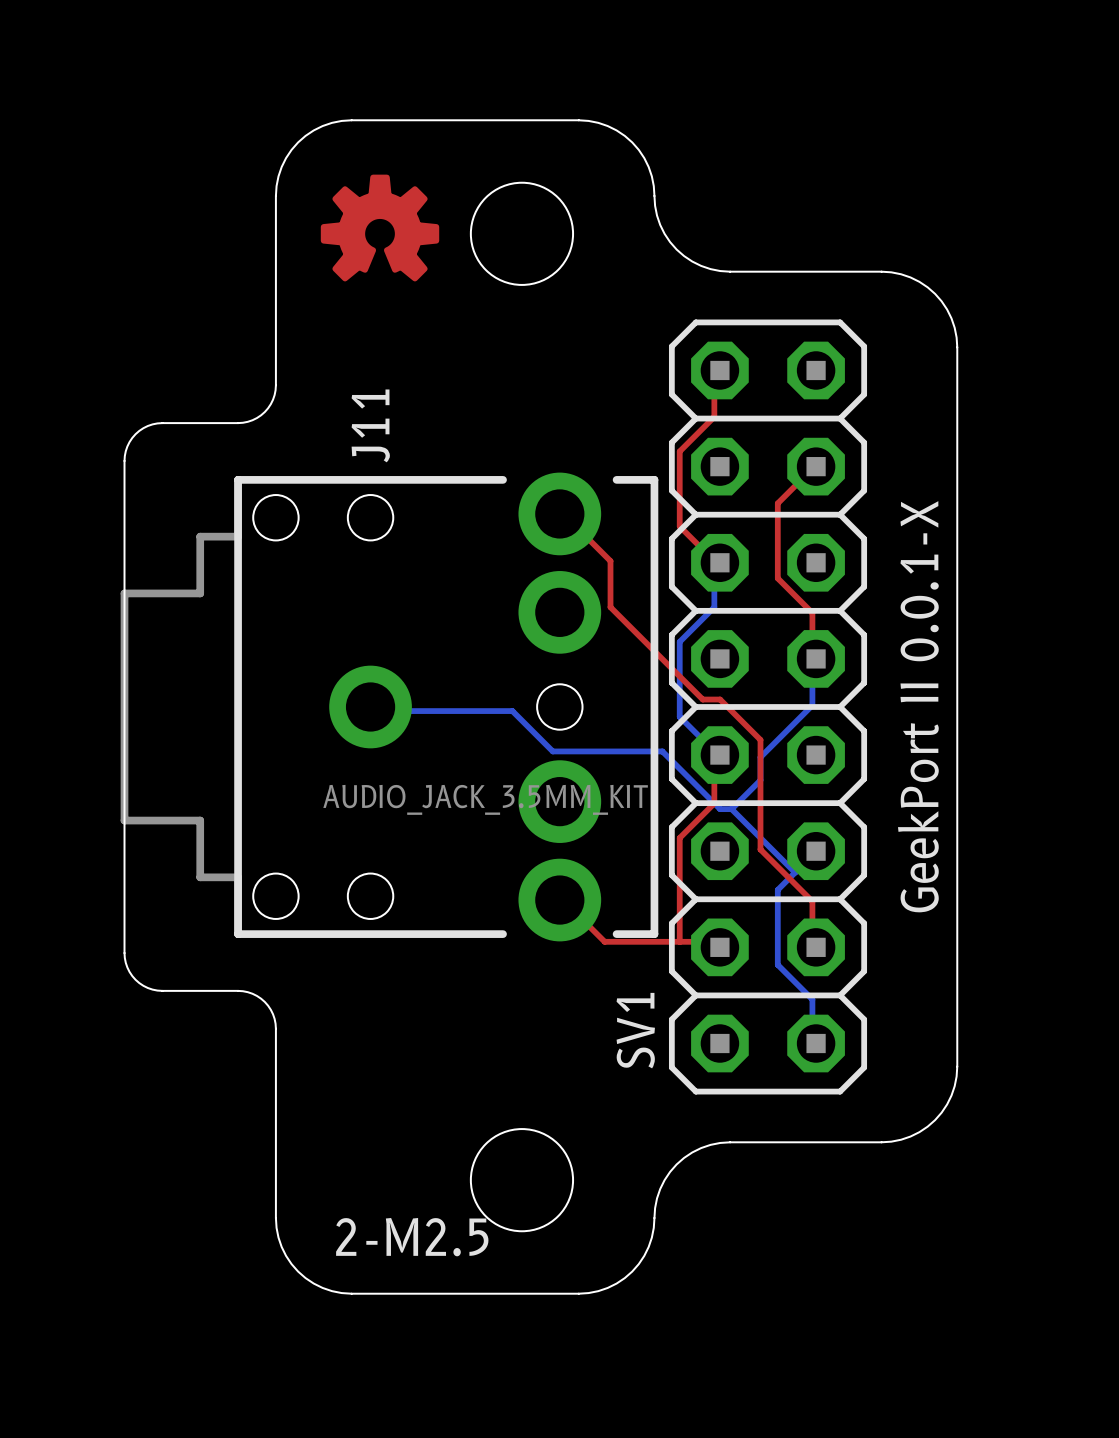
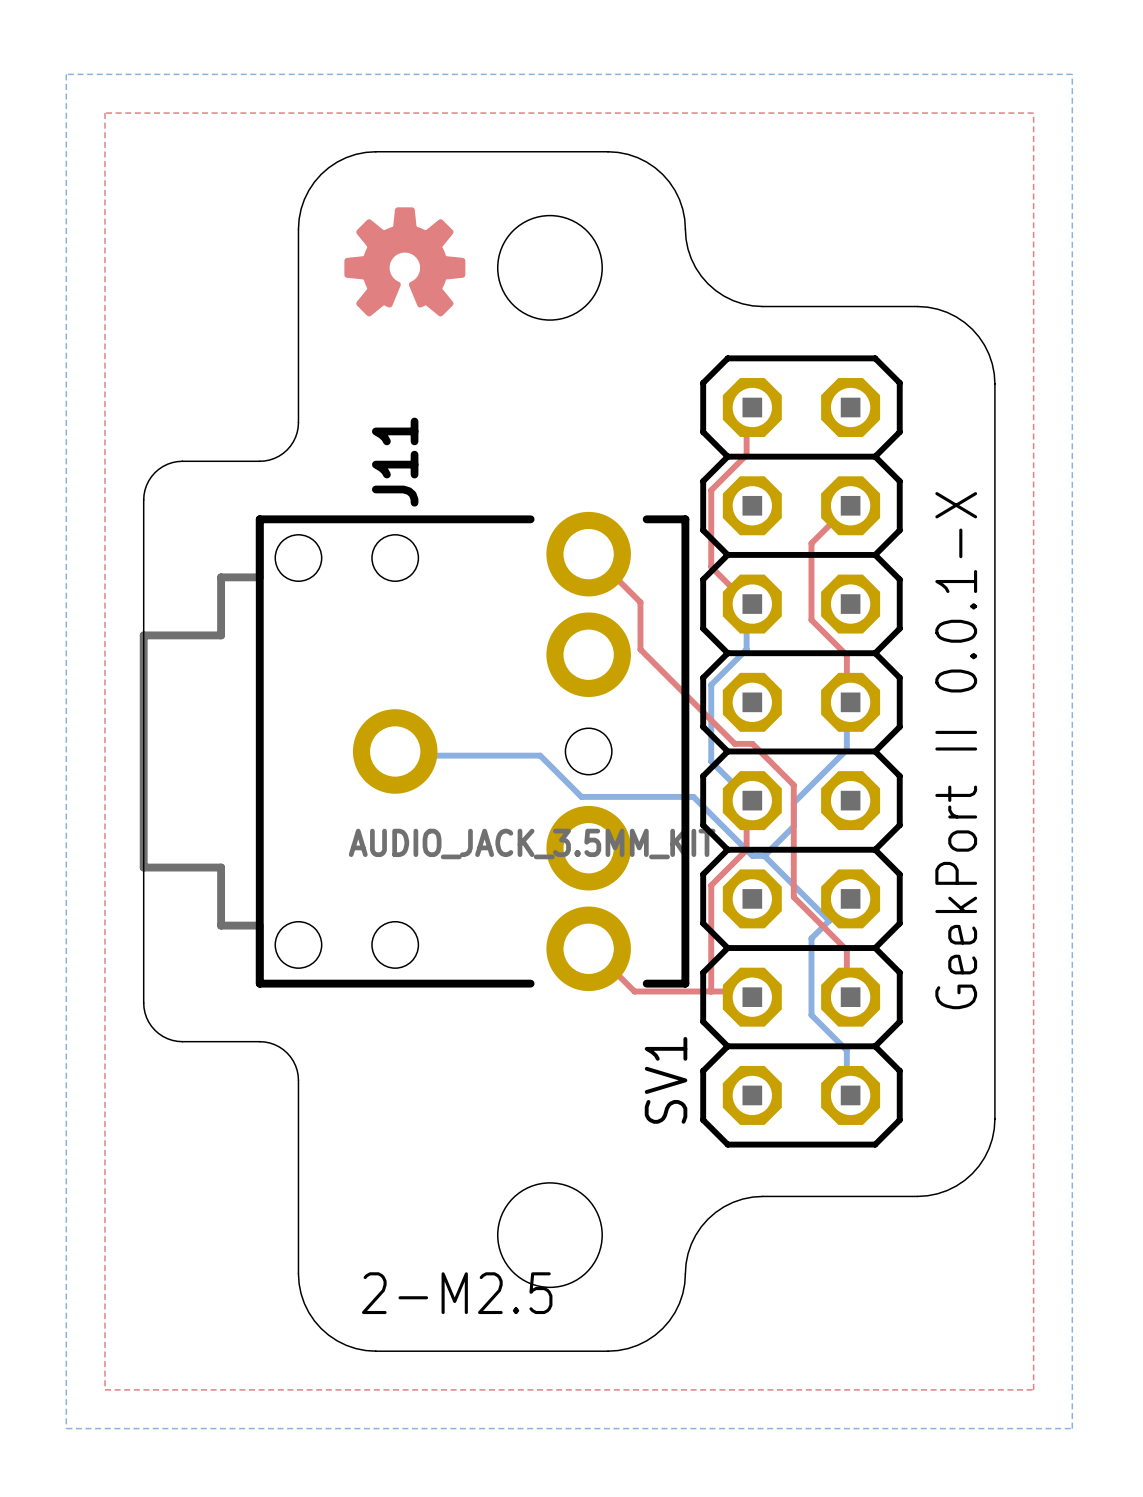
bottom zone outline: none -> (66, 74) (1072, 74) (1072, 1428) (66, 1428) (66, 74)
top zone outline: none -> (105, 113) (1033, 113) (1033, 1389) (105, 1389) (105, 113)

